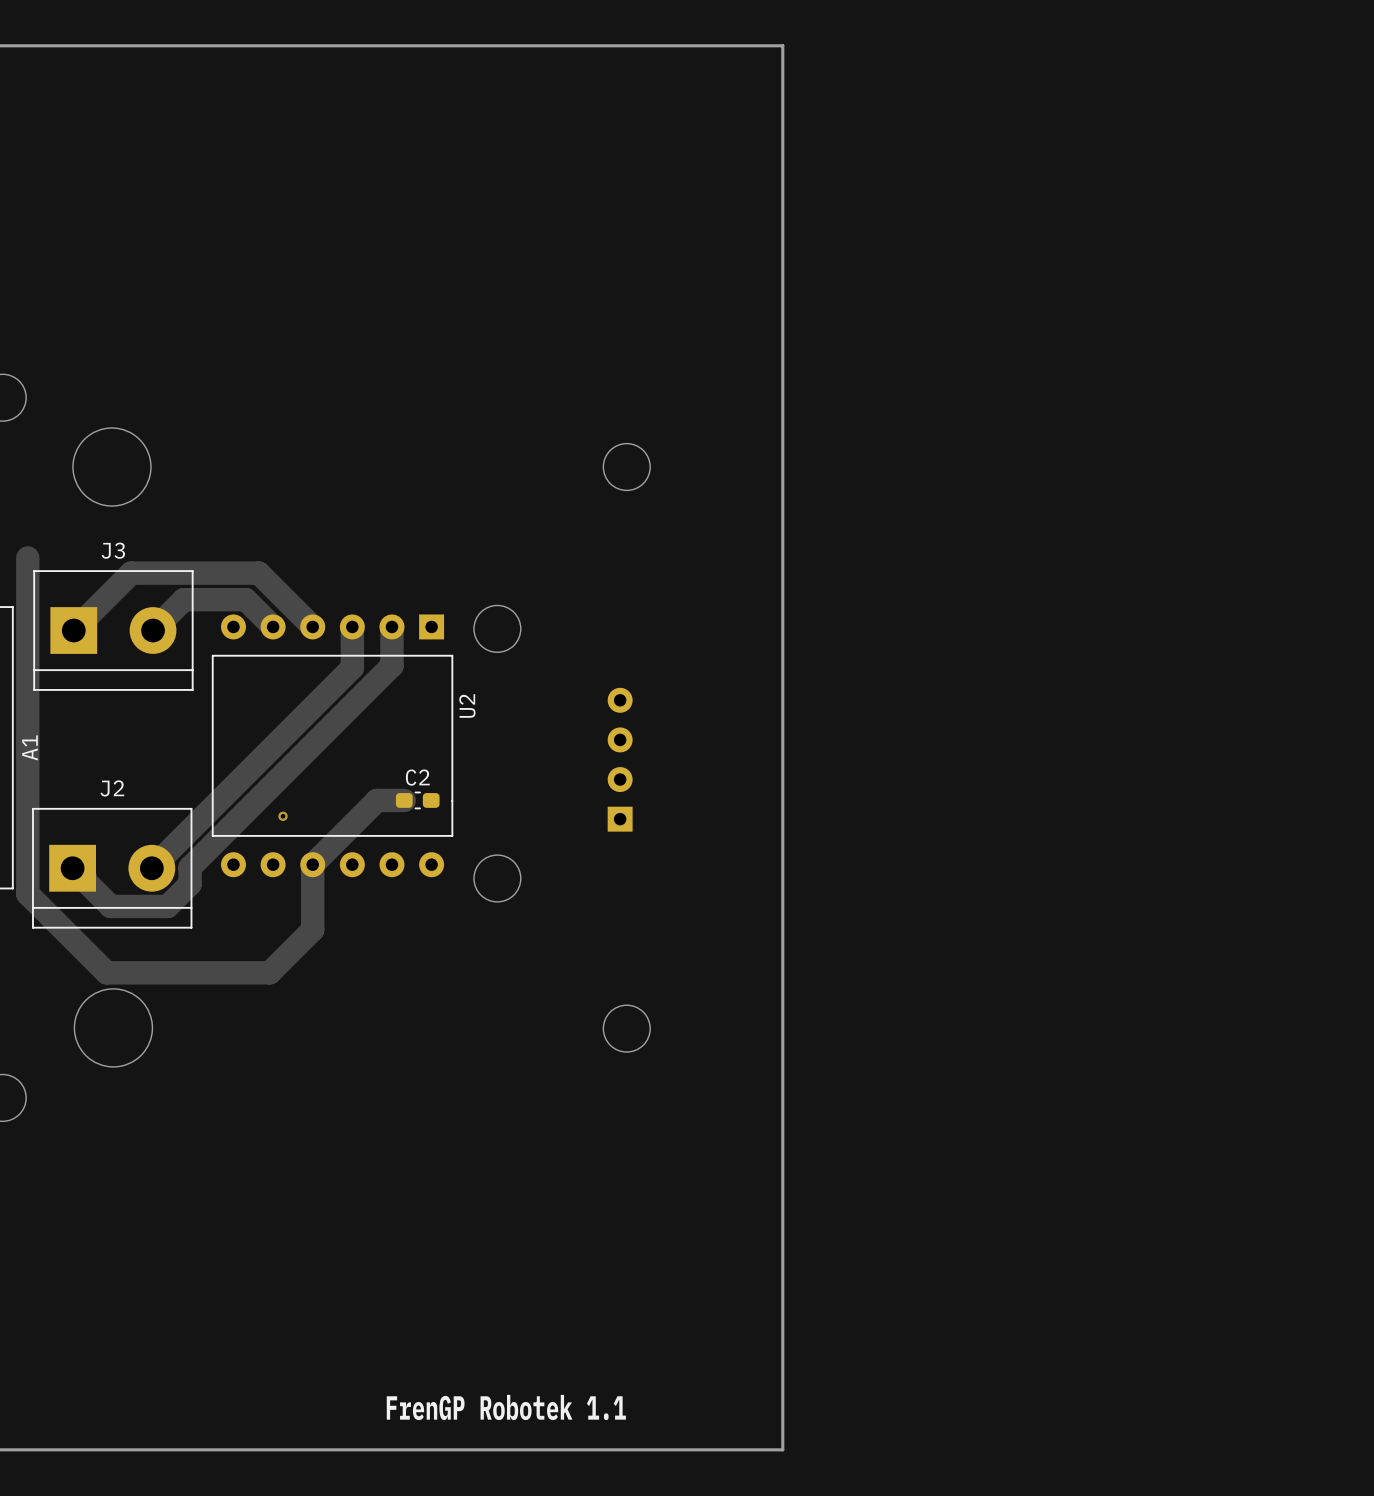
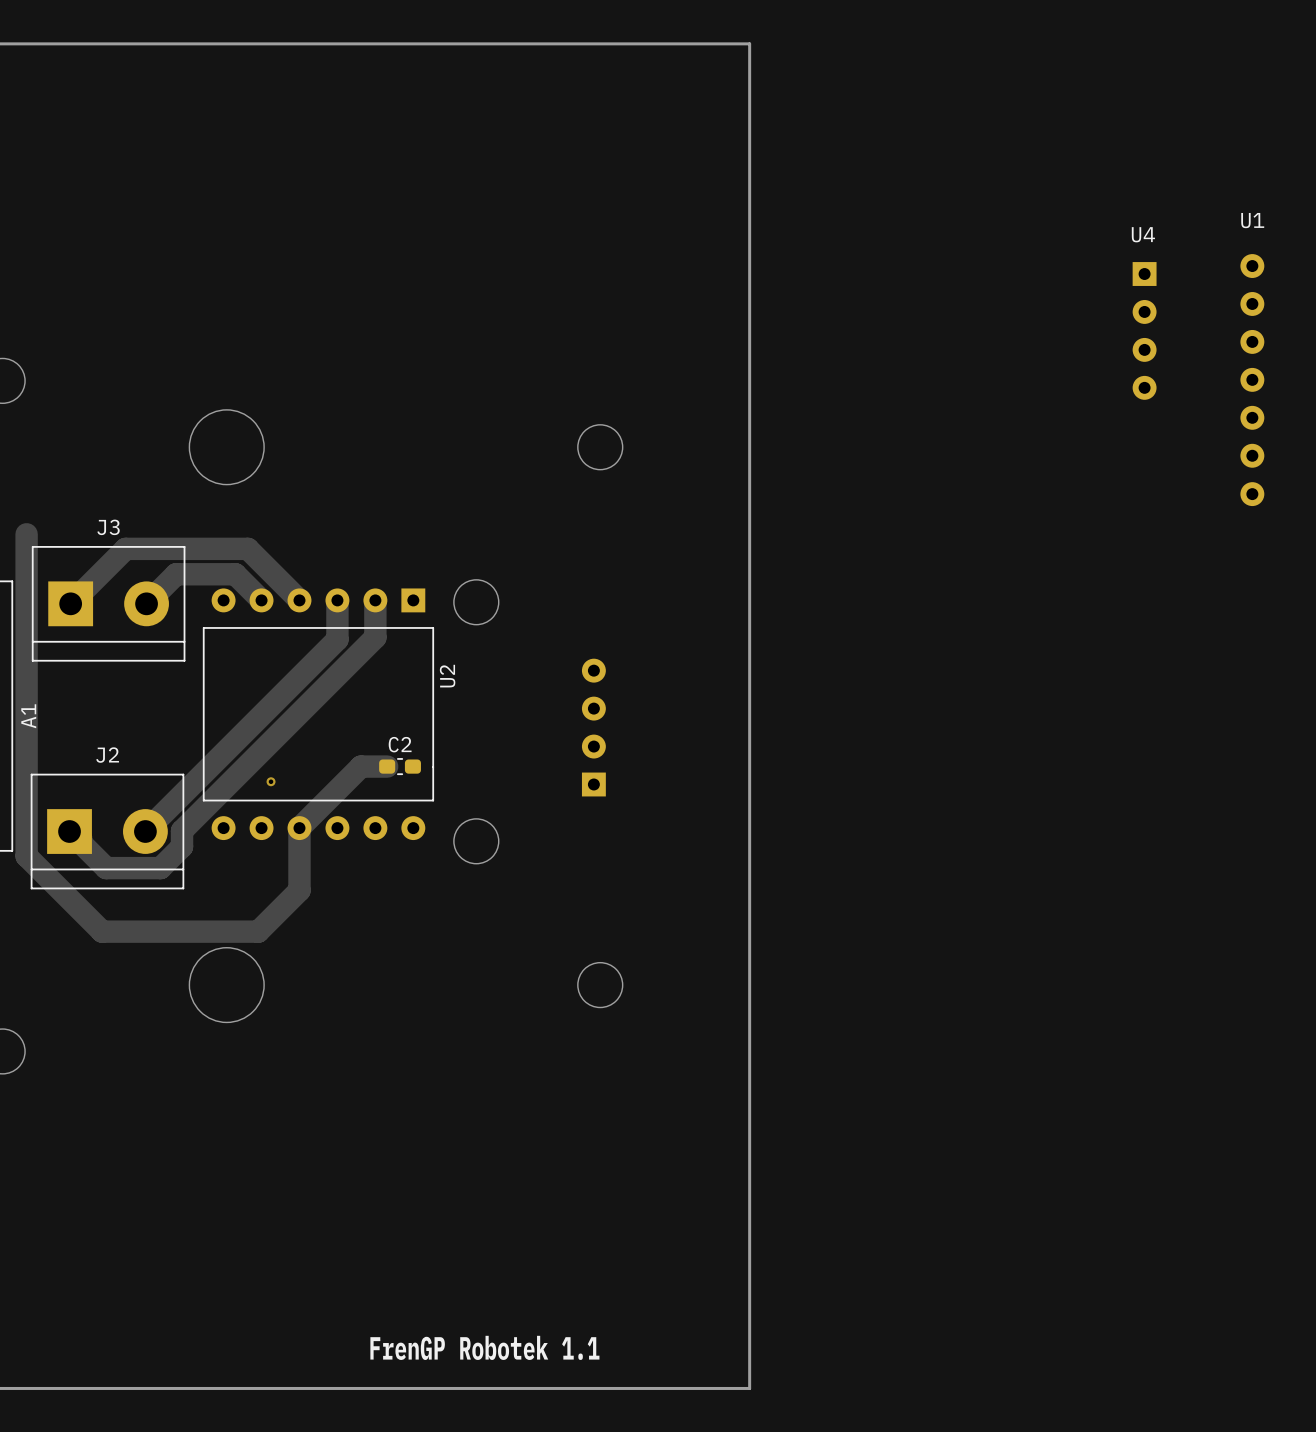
U4: none -> (1144, 330)
U1: none -> (1252, 380)
round board edge position: (111, 467) -> (226, 447)
round board edge position: (113, 1027) -> (226, 985)

